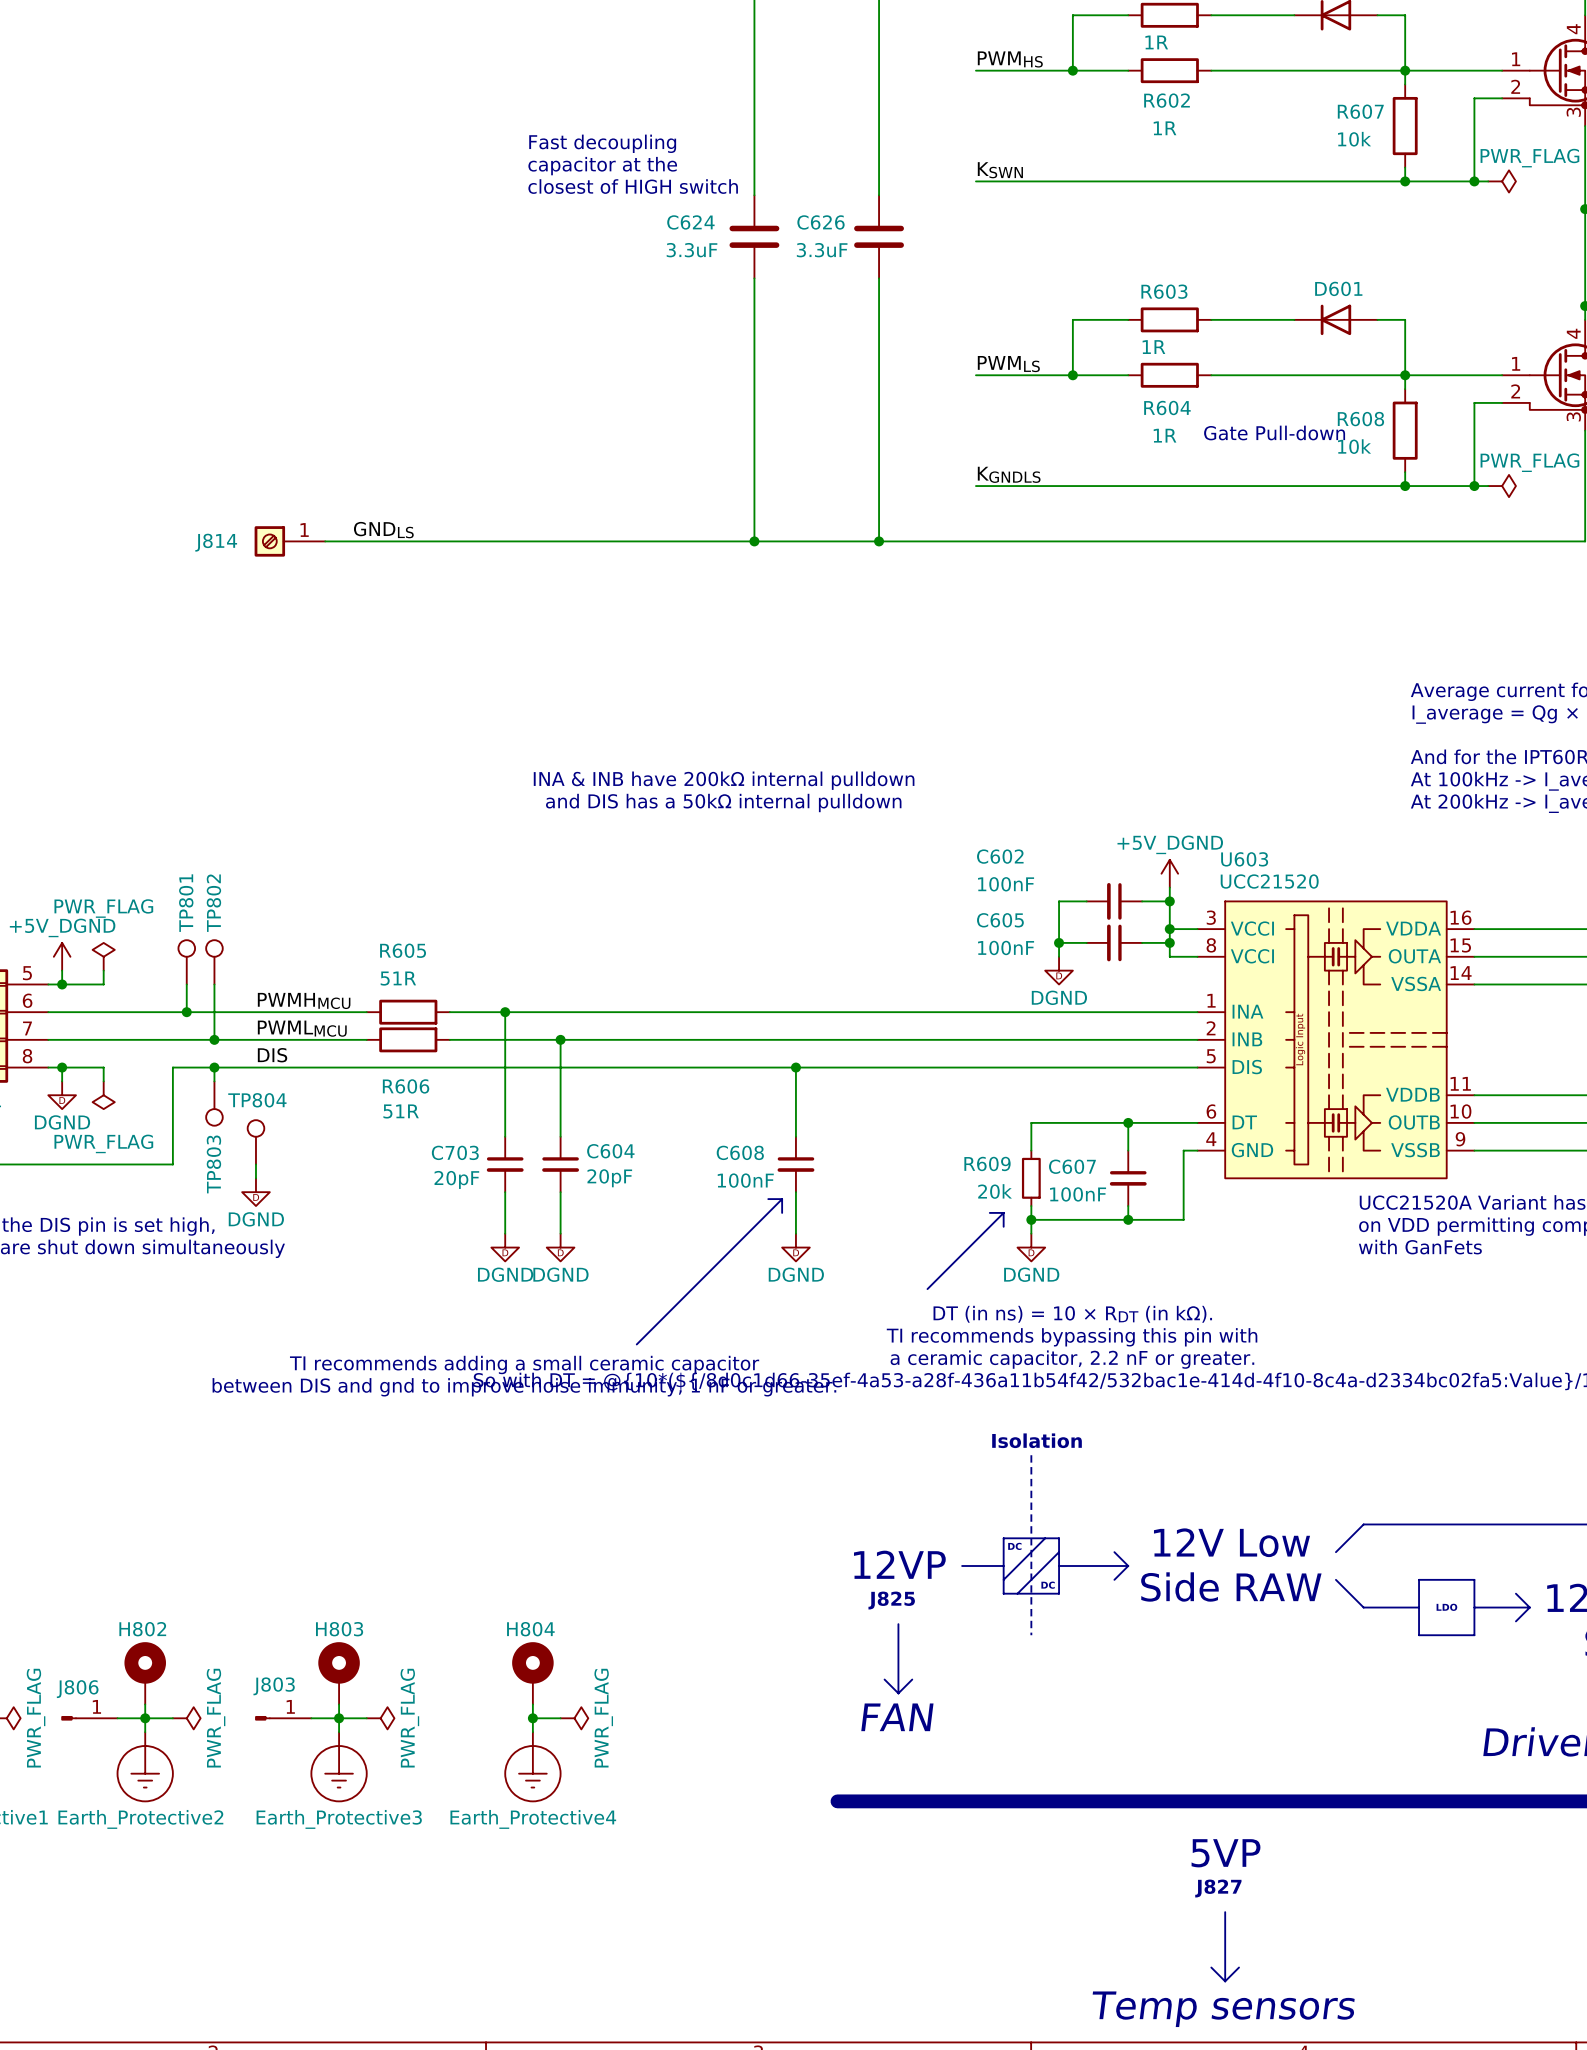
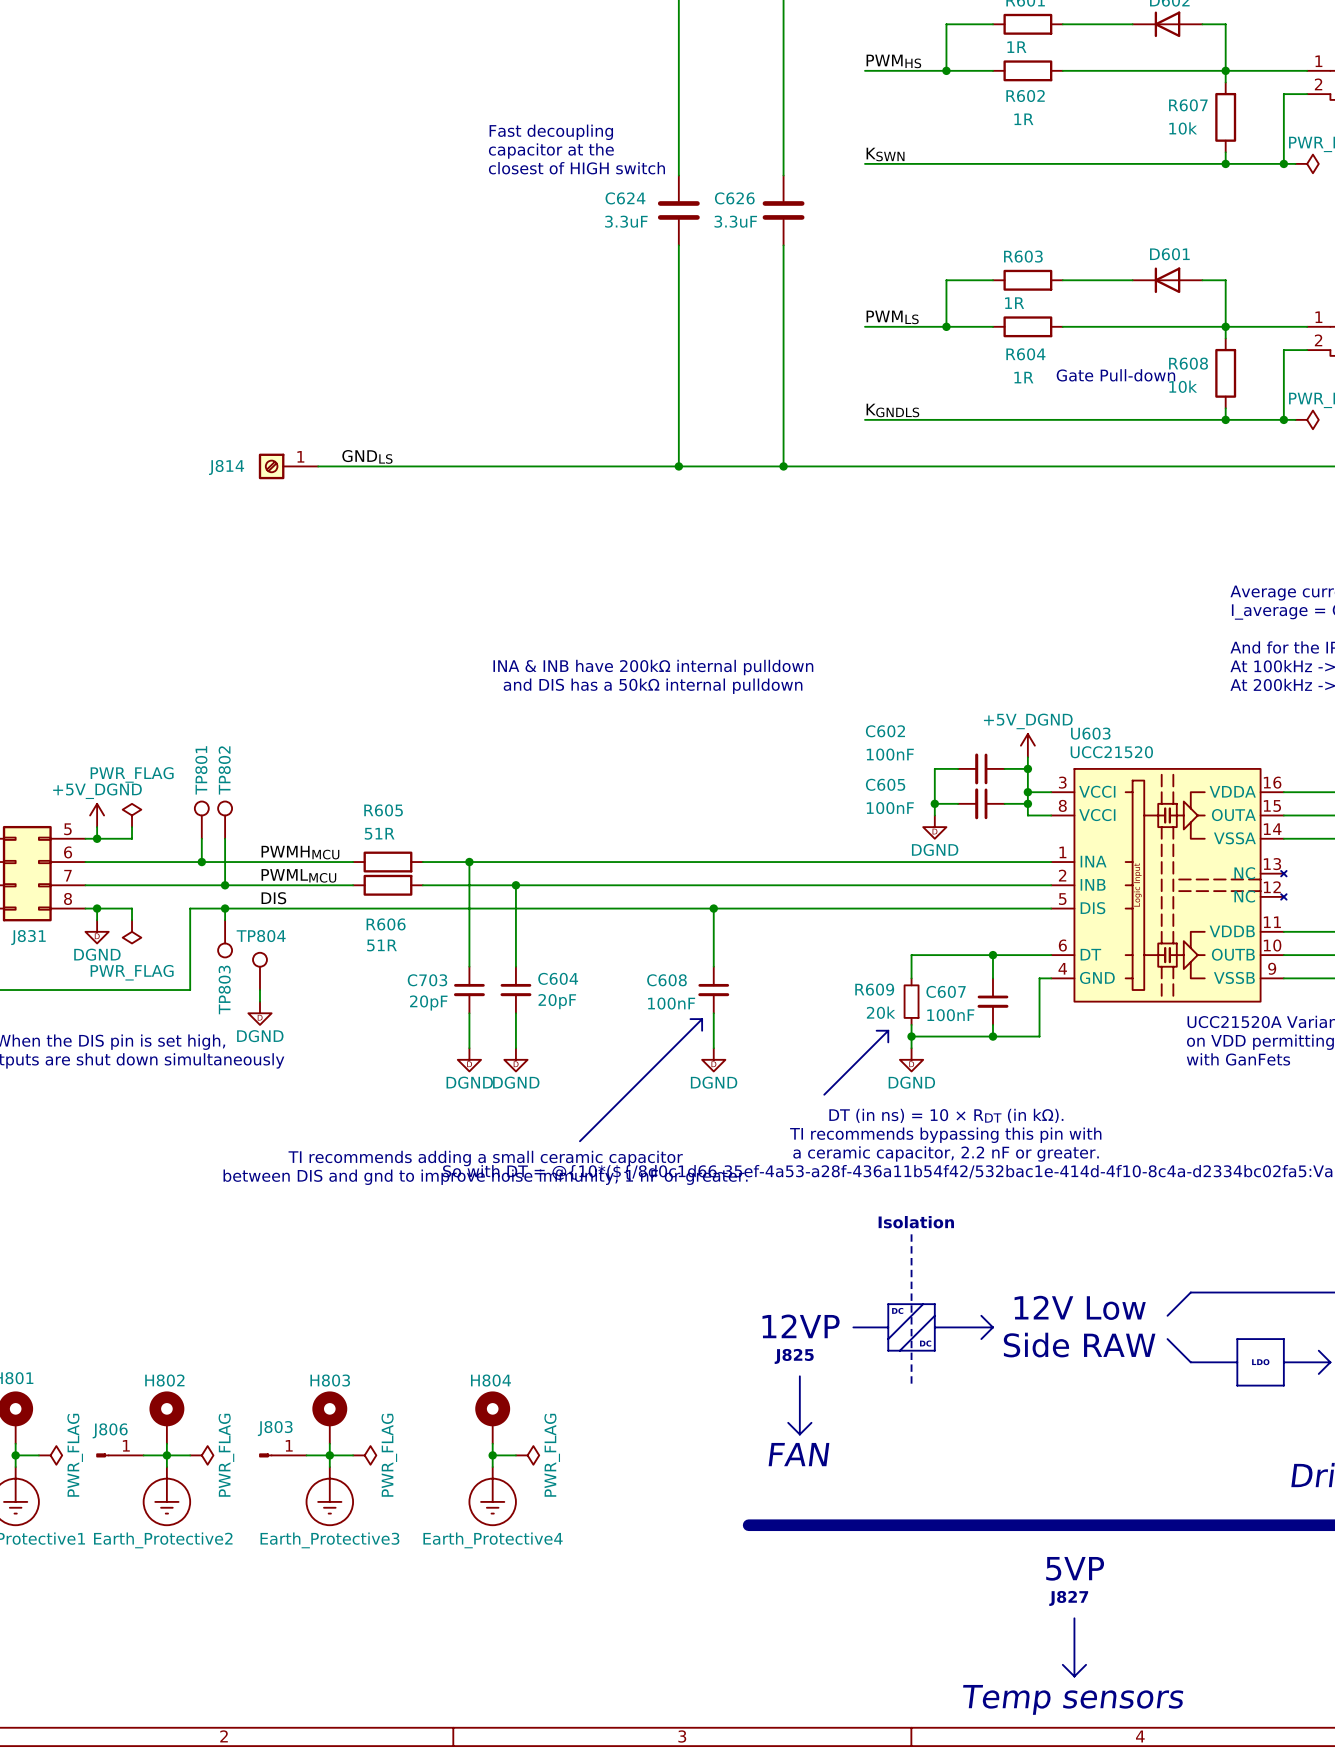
U603 symbol: [1197, 901, 1475, 1179] -> [1051, 768, 1287, 1002]

